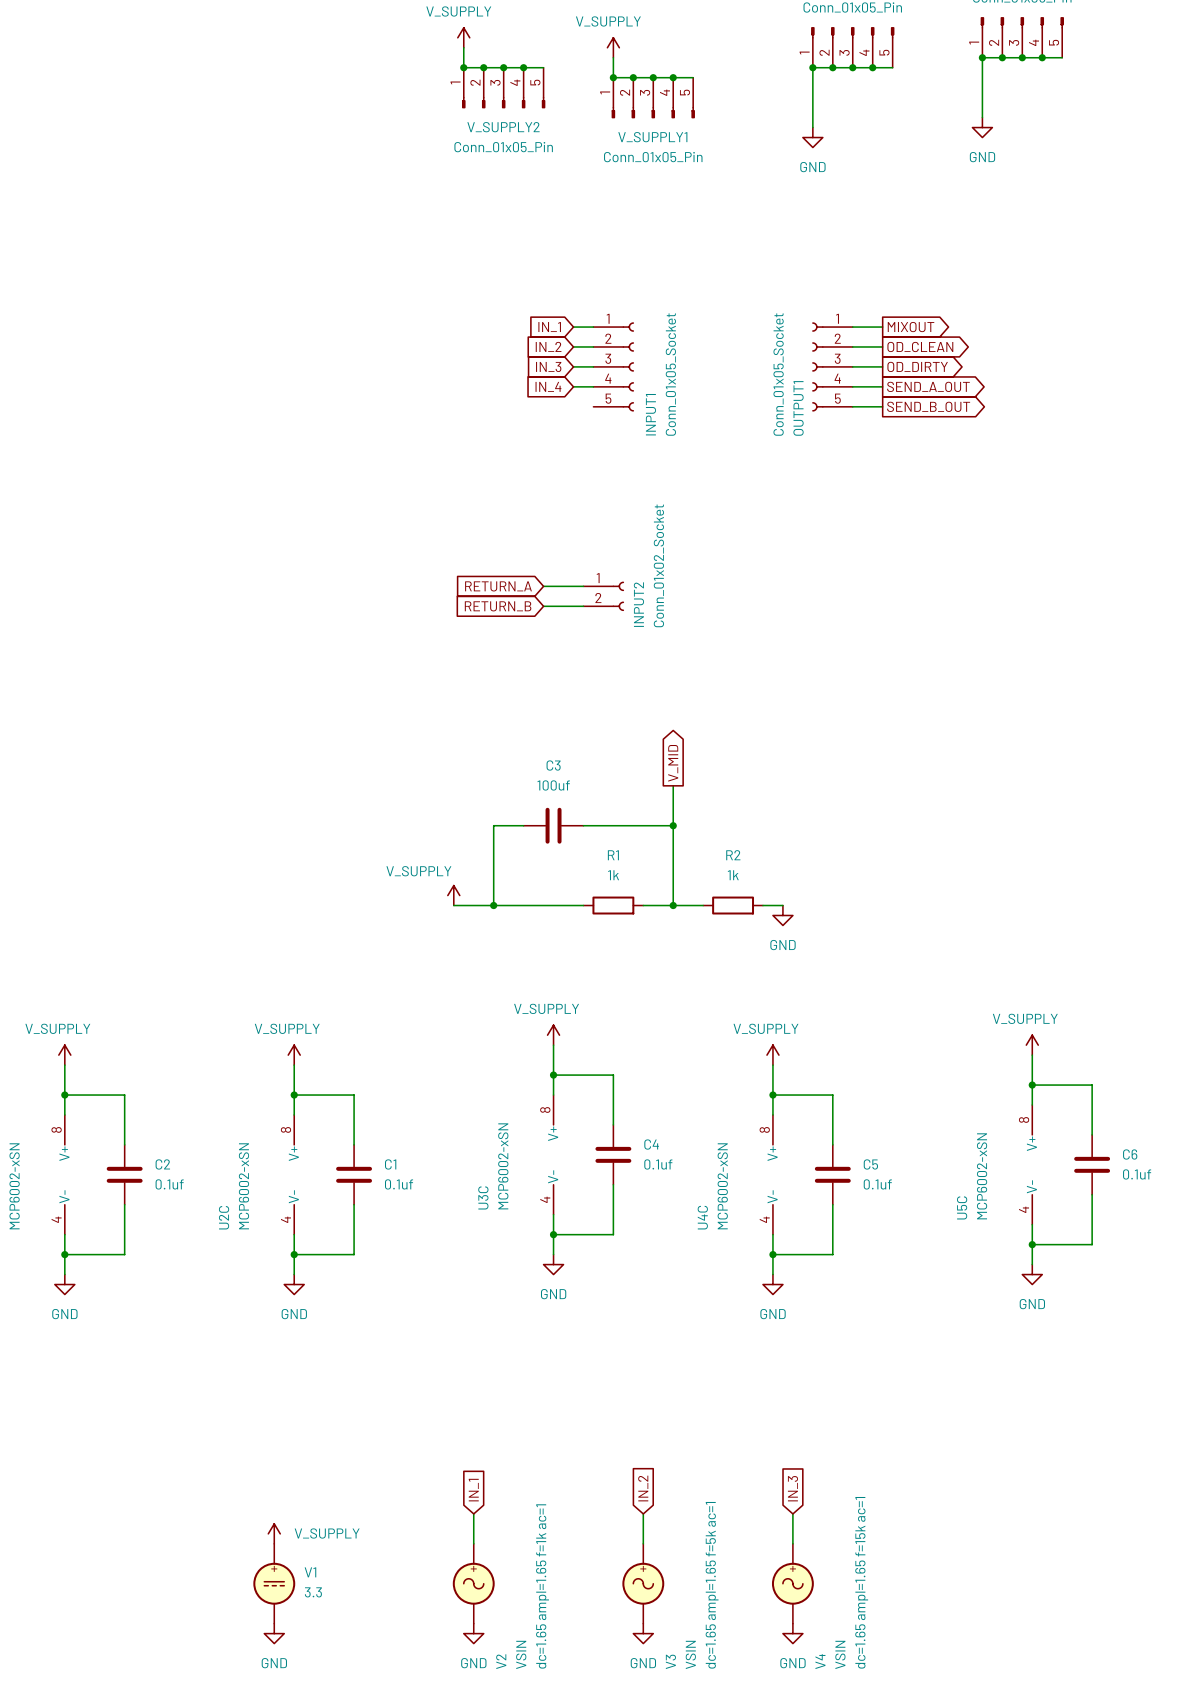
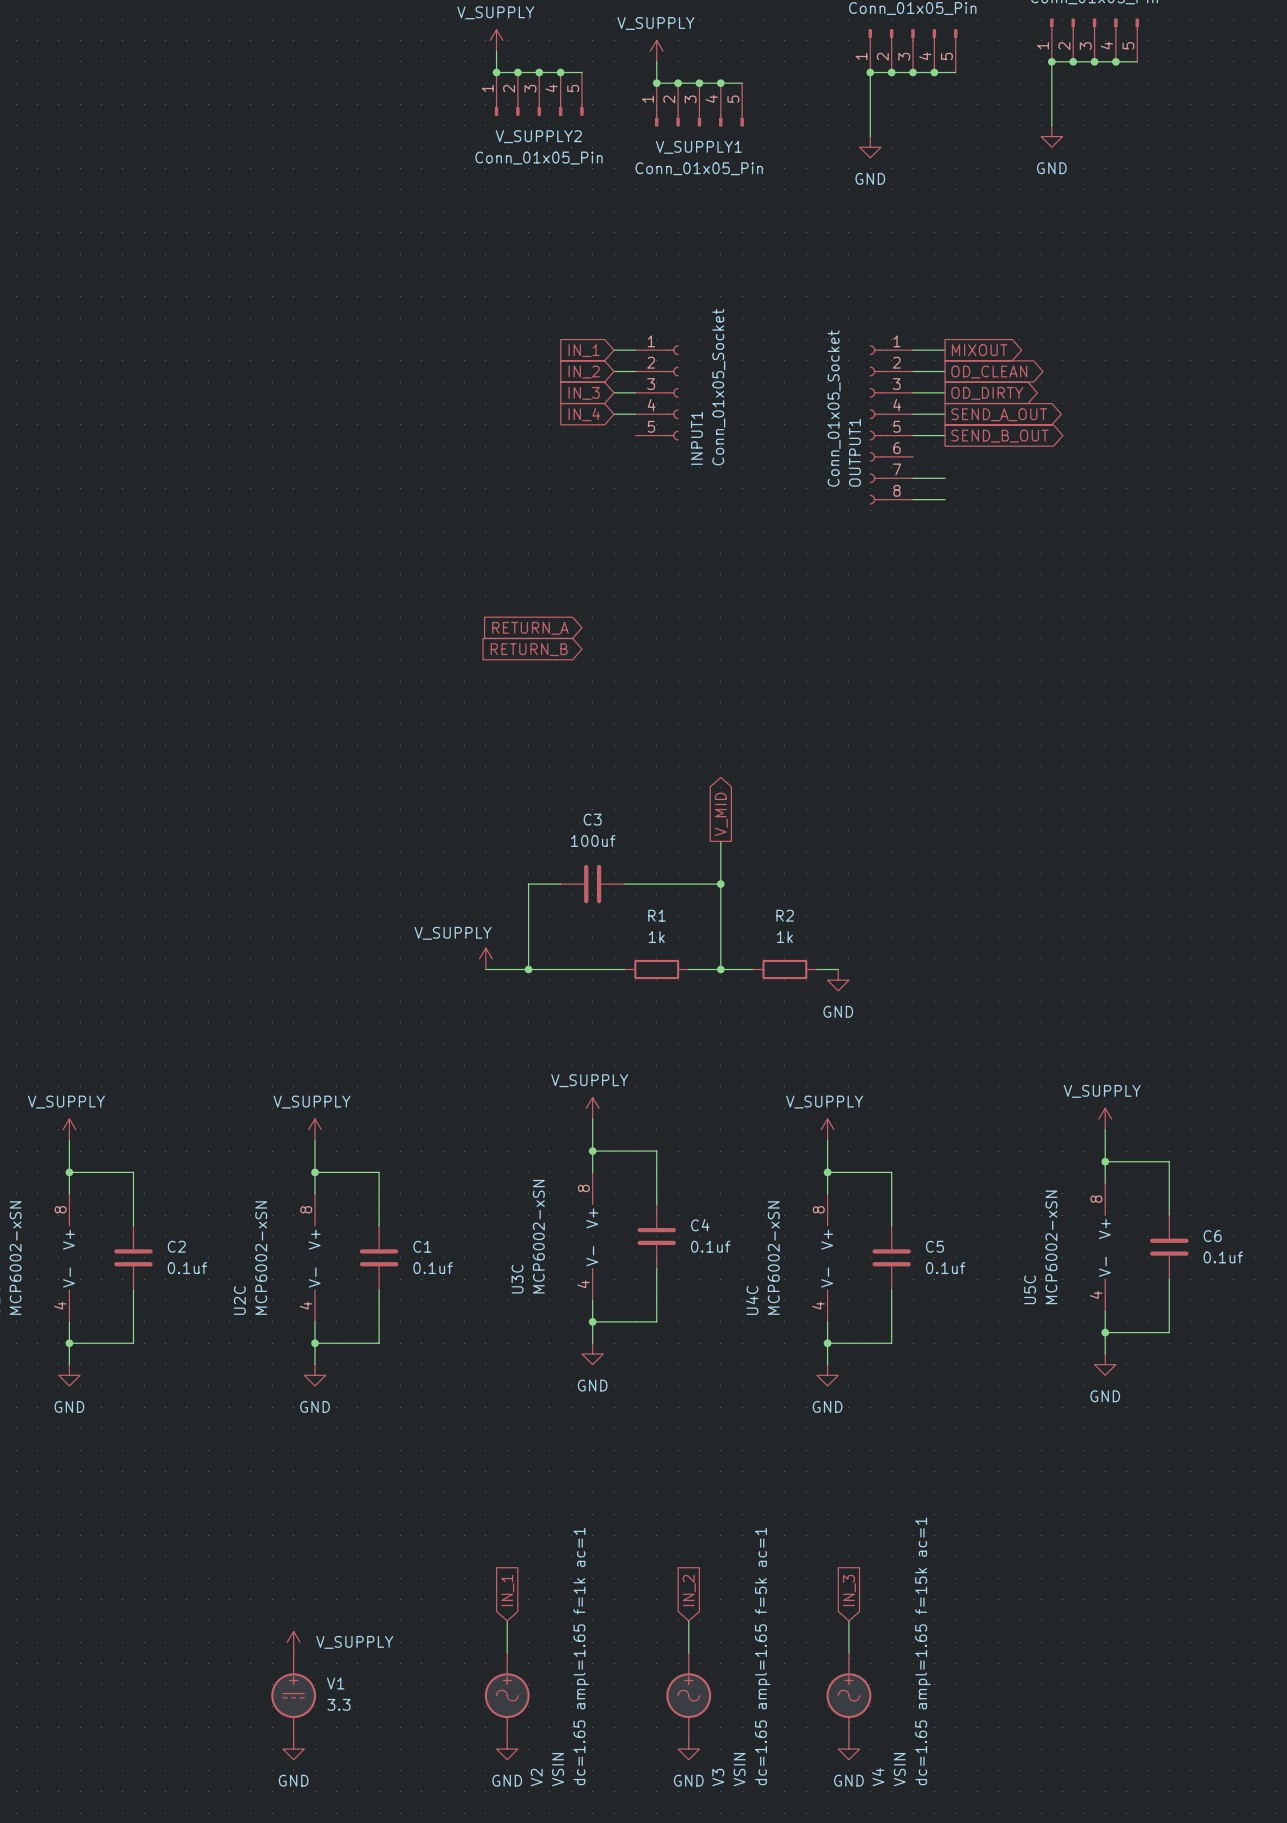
OUTPUT1 symbol: [812, 322, 853, 412] -> [869, 345, 914, 505]
wire: none -> (913, 478) (945, 478)
wire: none -> (913, 499) (945, 499)
wire: (543, 586) (583, 586) -> none
INPUT2: Conn_01x02_Socket (603, 596) -> none
wire: (543, 606) (583, 606) -> none

